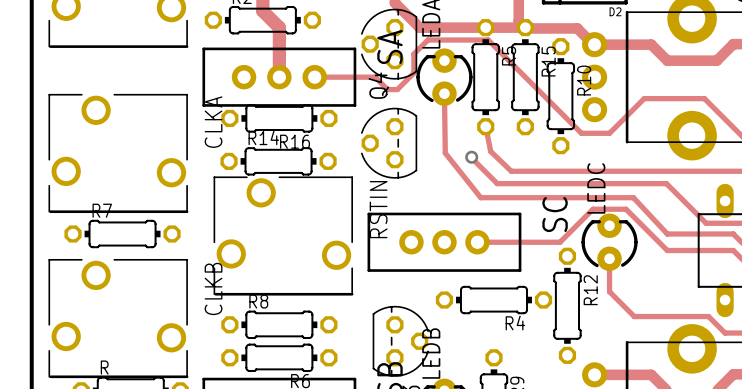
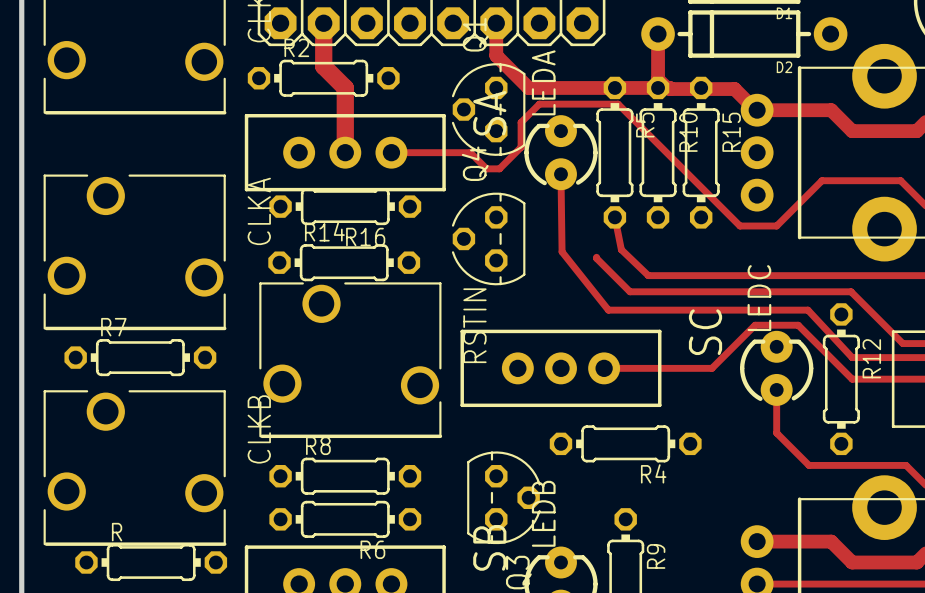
R15 position: (525, 77) -> (701, 152)
R10 position: (560, 96) -> (658, 152)
via: (471, 157) -> none
R12 position: (567, 305) -> (841, 379)

